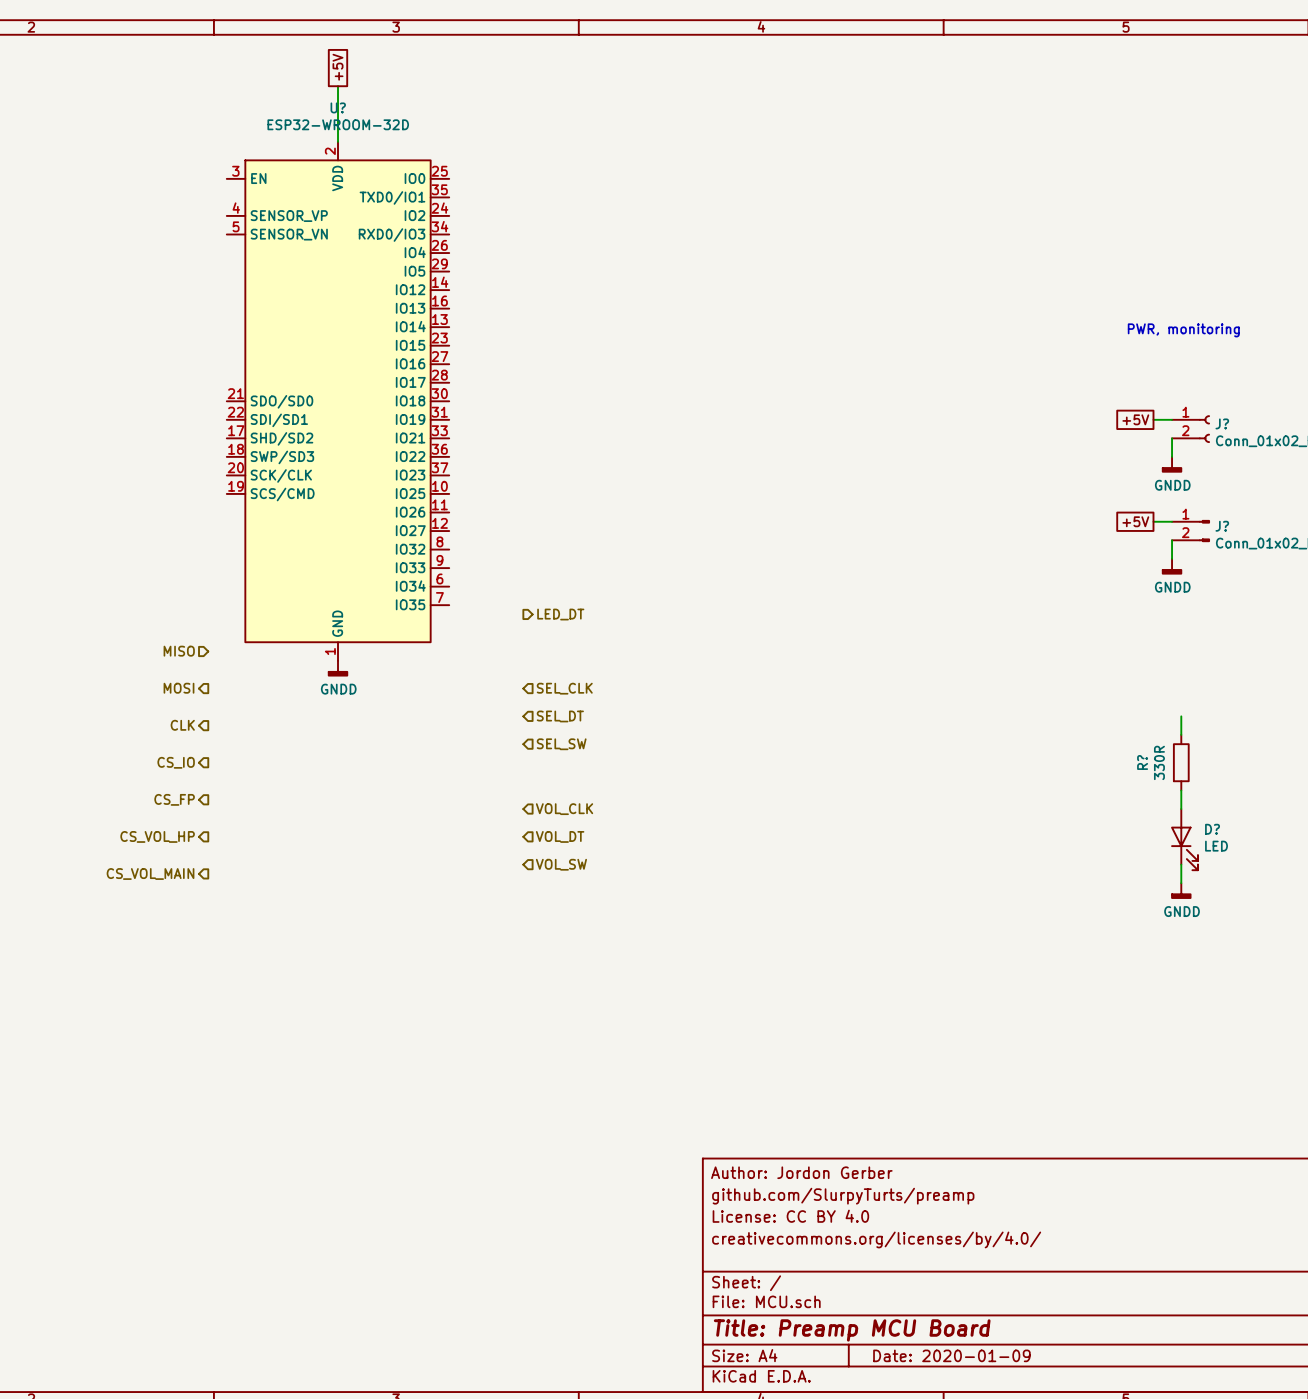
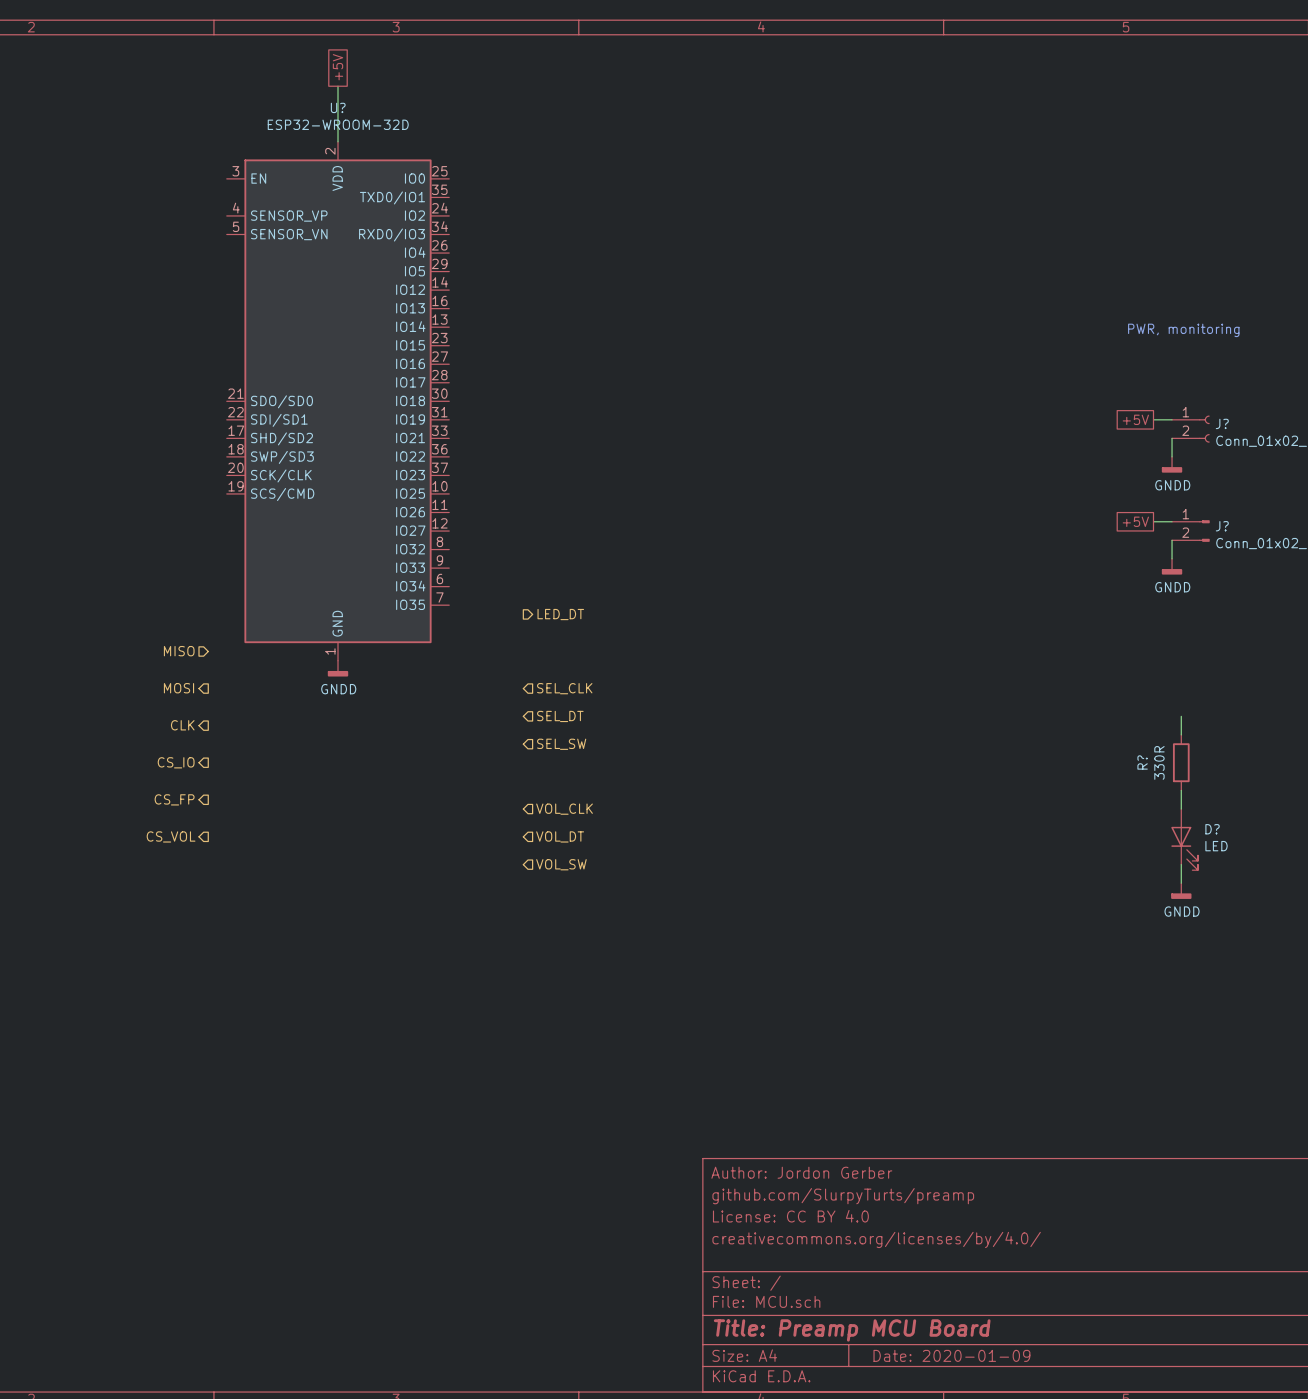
hierarchical label: CS_VOL_HP (157, 836) -> CS_VOL (171, 836)
hierarchical label: CS_VOL_MAIN (150, 874) -> none

